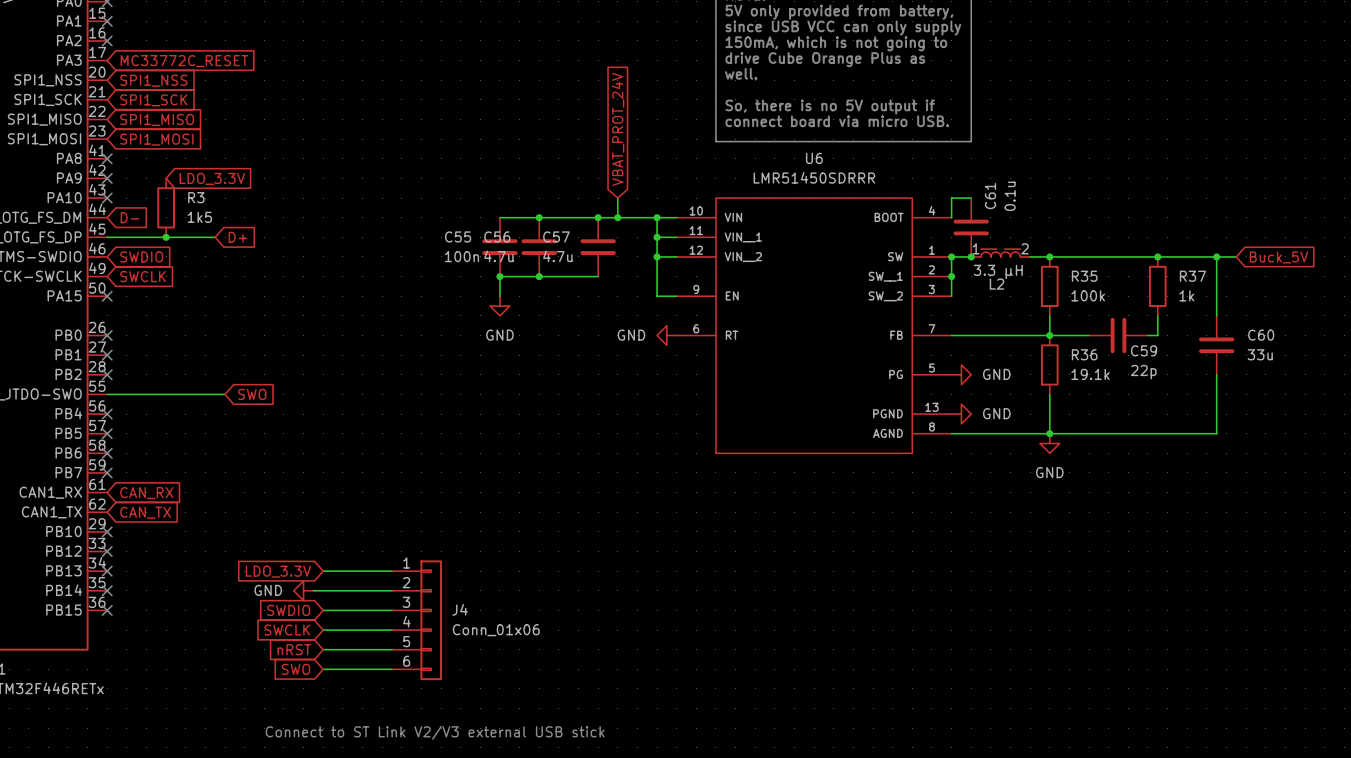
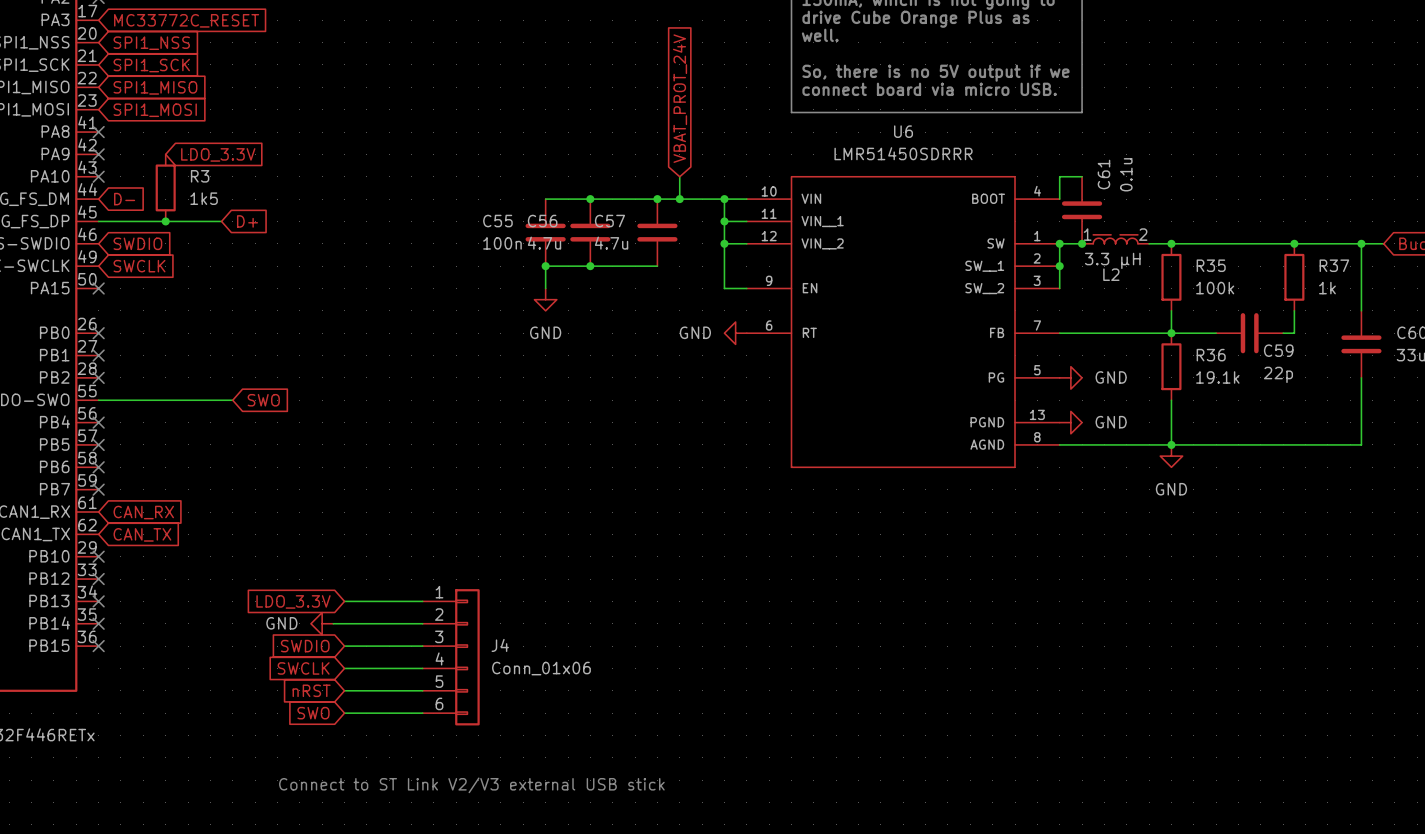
text: So, there is no 5V output if (830, 107) -> So, there is no 5V output if we (935, 73)

